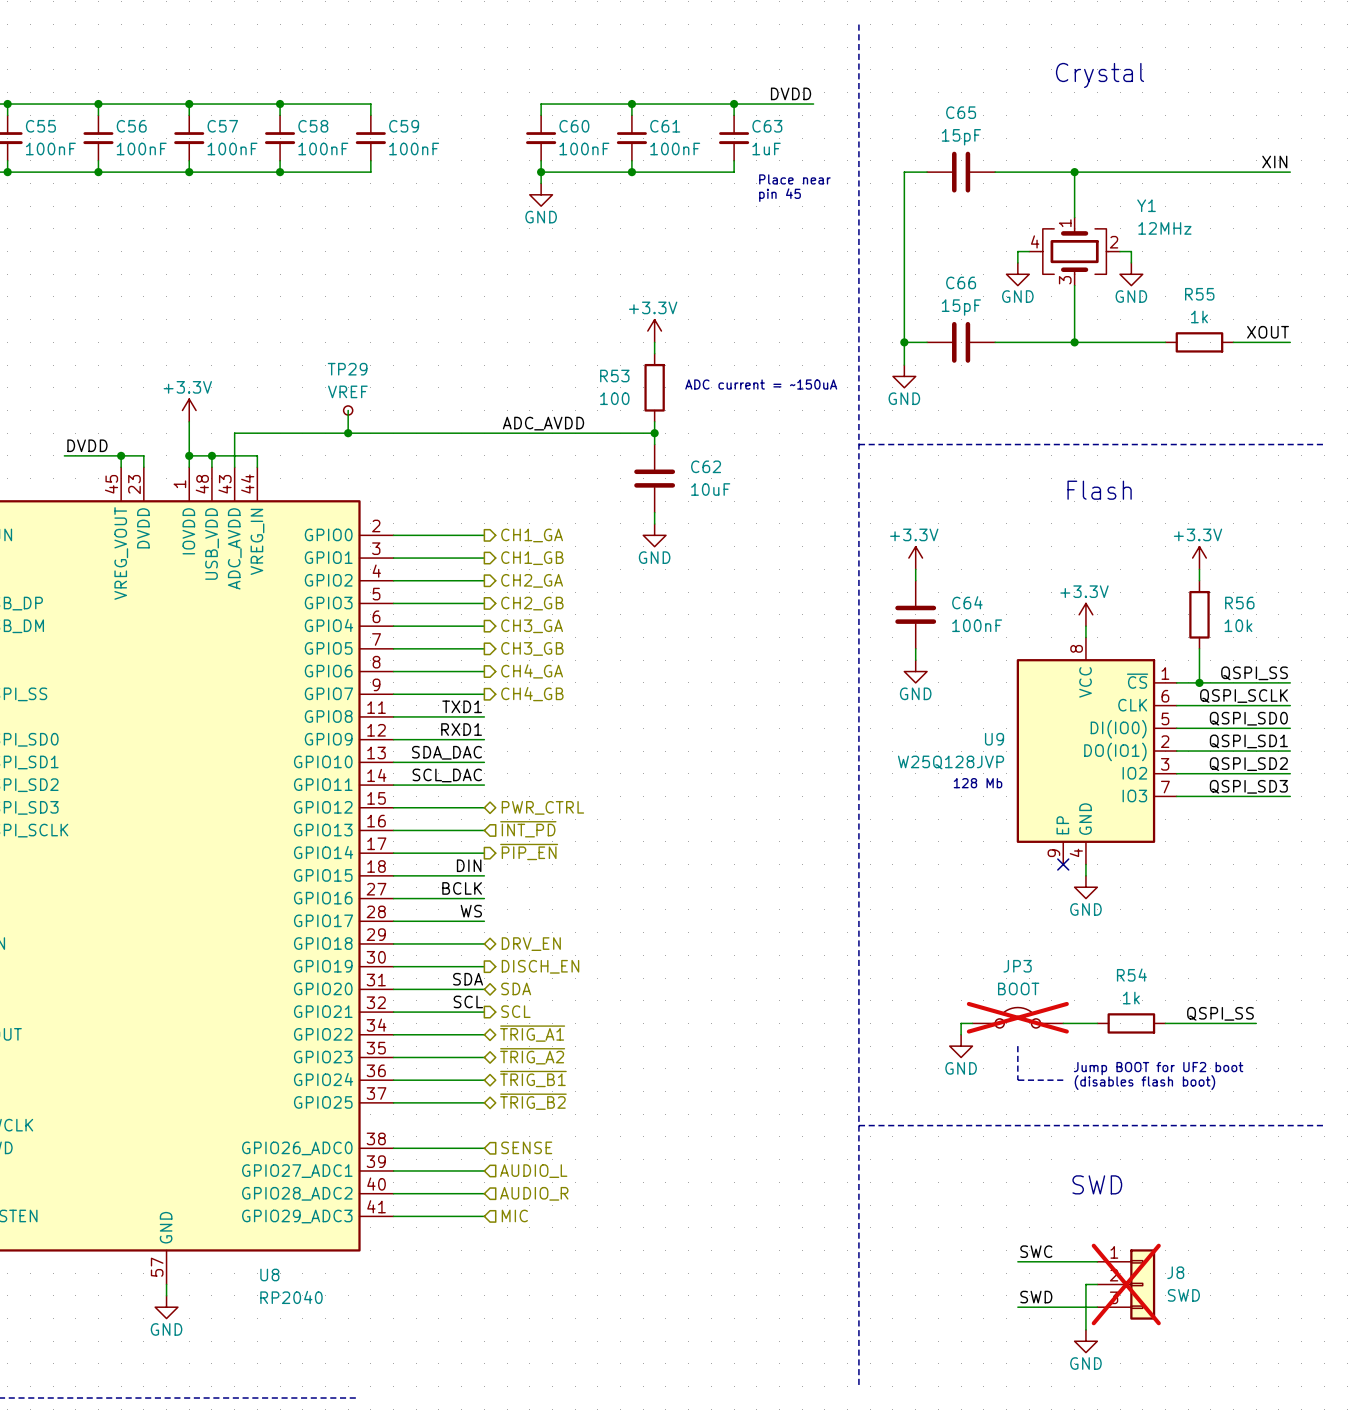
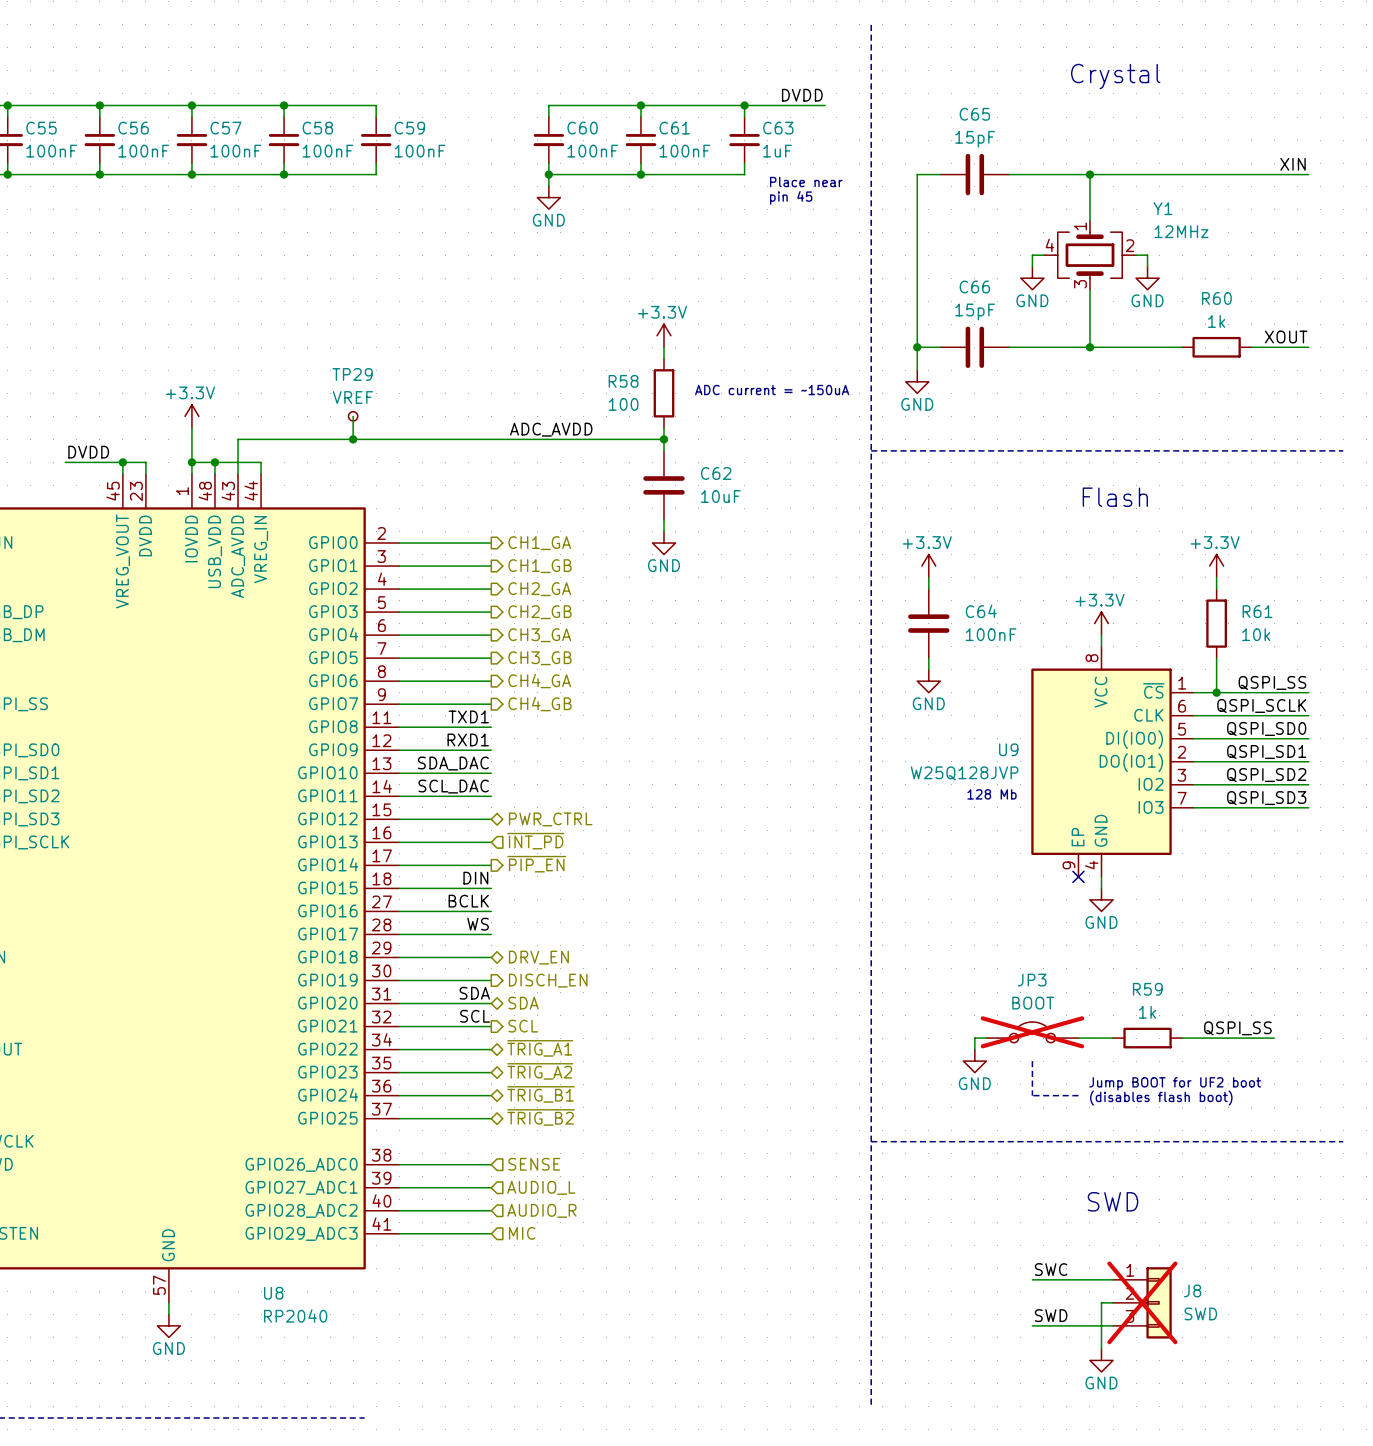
R55 name: R55 (1199, 294) -> R60 (1216, 298)
R53 name: R53 (614, 376) -> R58 (623, 381)
R56 name: R56 (1239, 603) -> R61 (1257, 611)
R54 name: R54 (1131, 975) -> R59 (1147, 989)

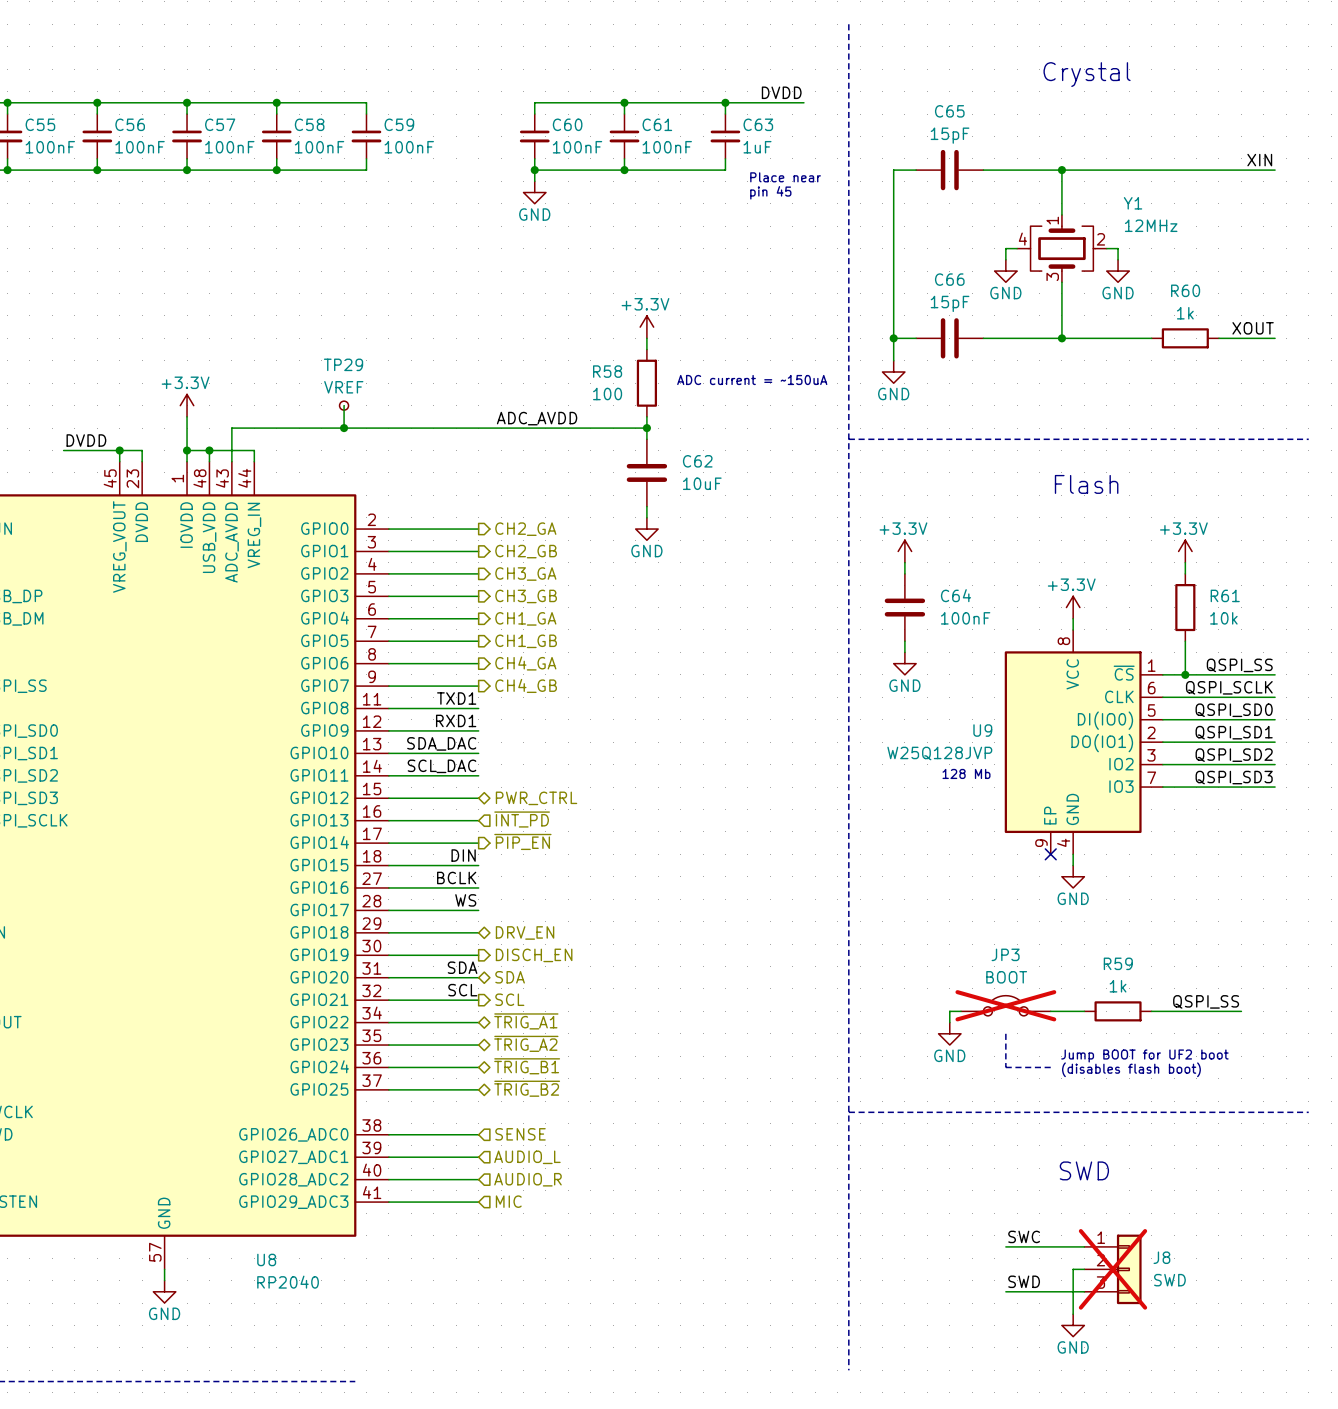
hierarchical label: CH1_GA (539, 543) -> CH2_GA (525, 529)
hierarchical label: CH1_GB (539, 566) -> CH2_GB (526, 551)
hierarchical label: CH2_GA (539, 589) -> CH3_GA (525, 574)
hierarchical label: CH2_GB (539, 612) -> CH3_GB (526, 596)
hierarchical label: CH3_GA (539, 635) -> CH1_GA (525, 618)
hierarchical label: CH3_GB (539, 658) -> CH1_GB (526, 641)

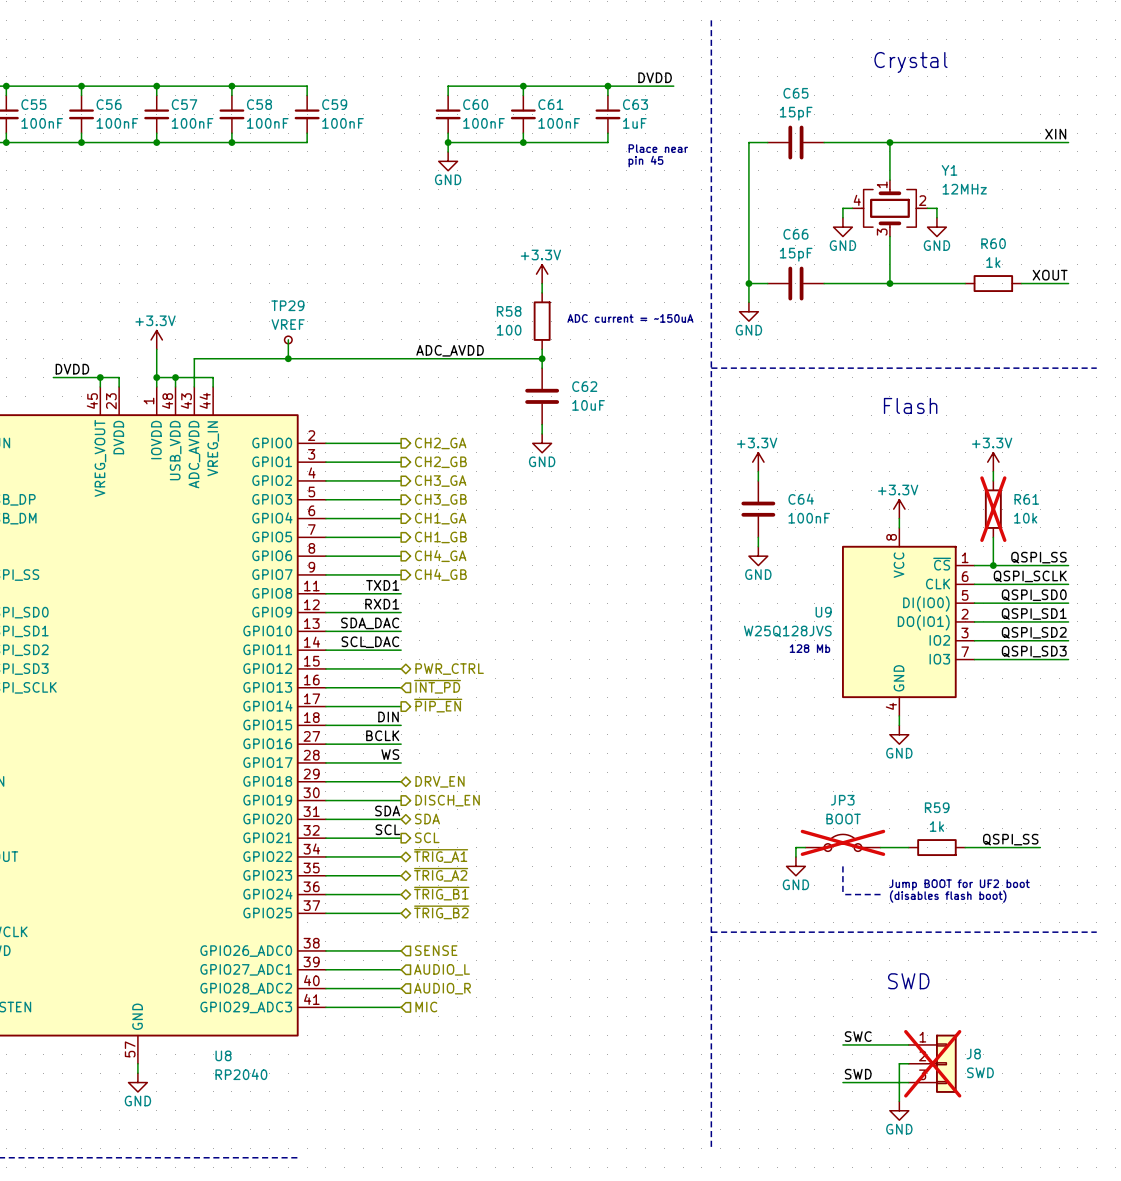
R61 do-not-place cross: none -> (993, 509)
U9 symbol: [1004, 629, 1163, 855] -> [842, 527, 975, 716]
U9 value: W25Q128JVP (939, 753) -> W25Q128JVS (787, 631)
no-connect mark: (1050, 854) -> none

